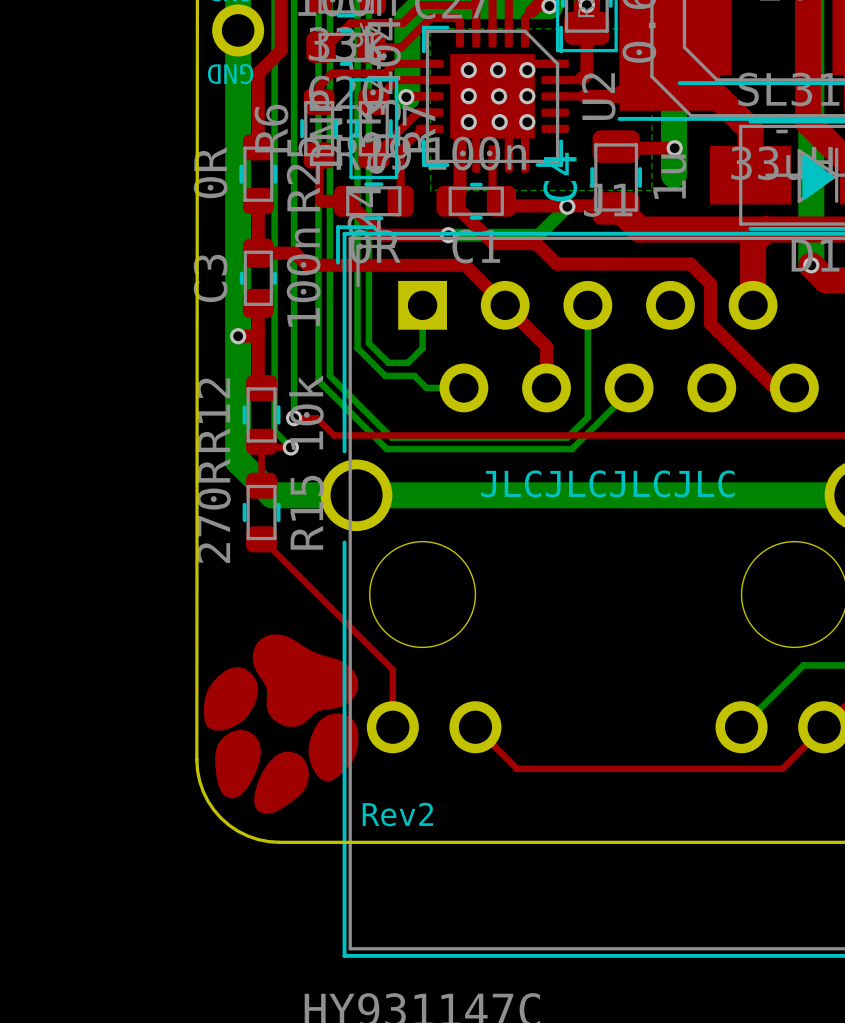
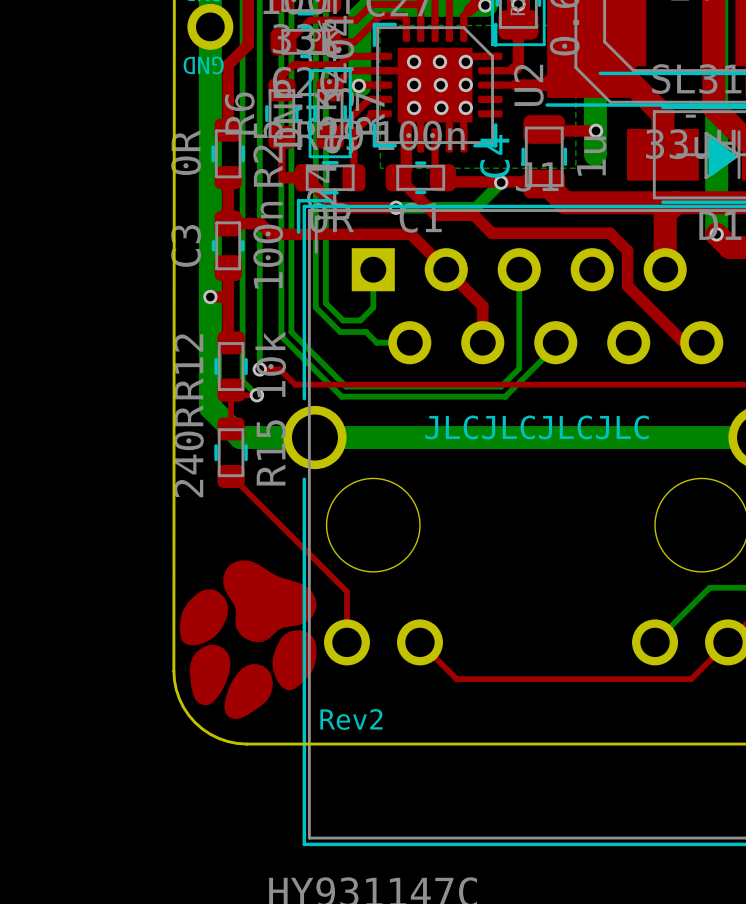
R15 value: 270R (213, 510) -> 240R (188, 451)

